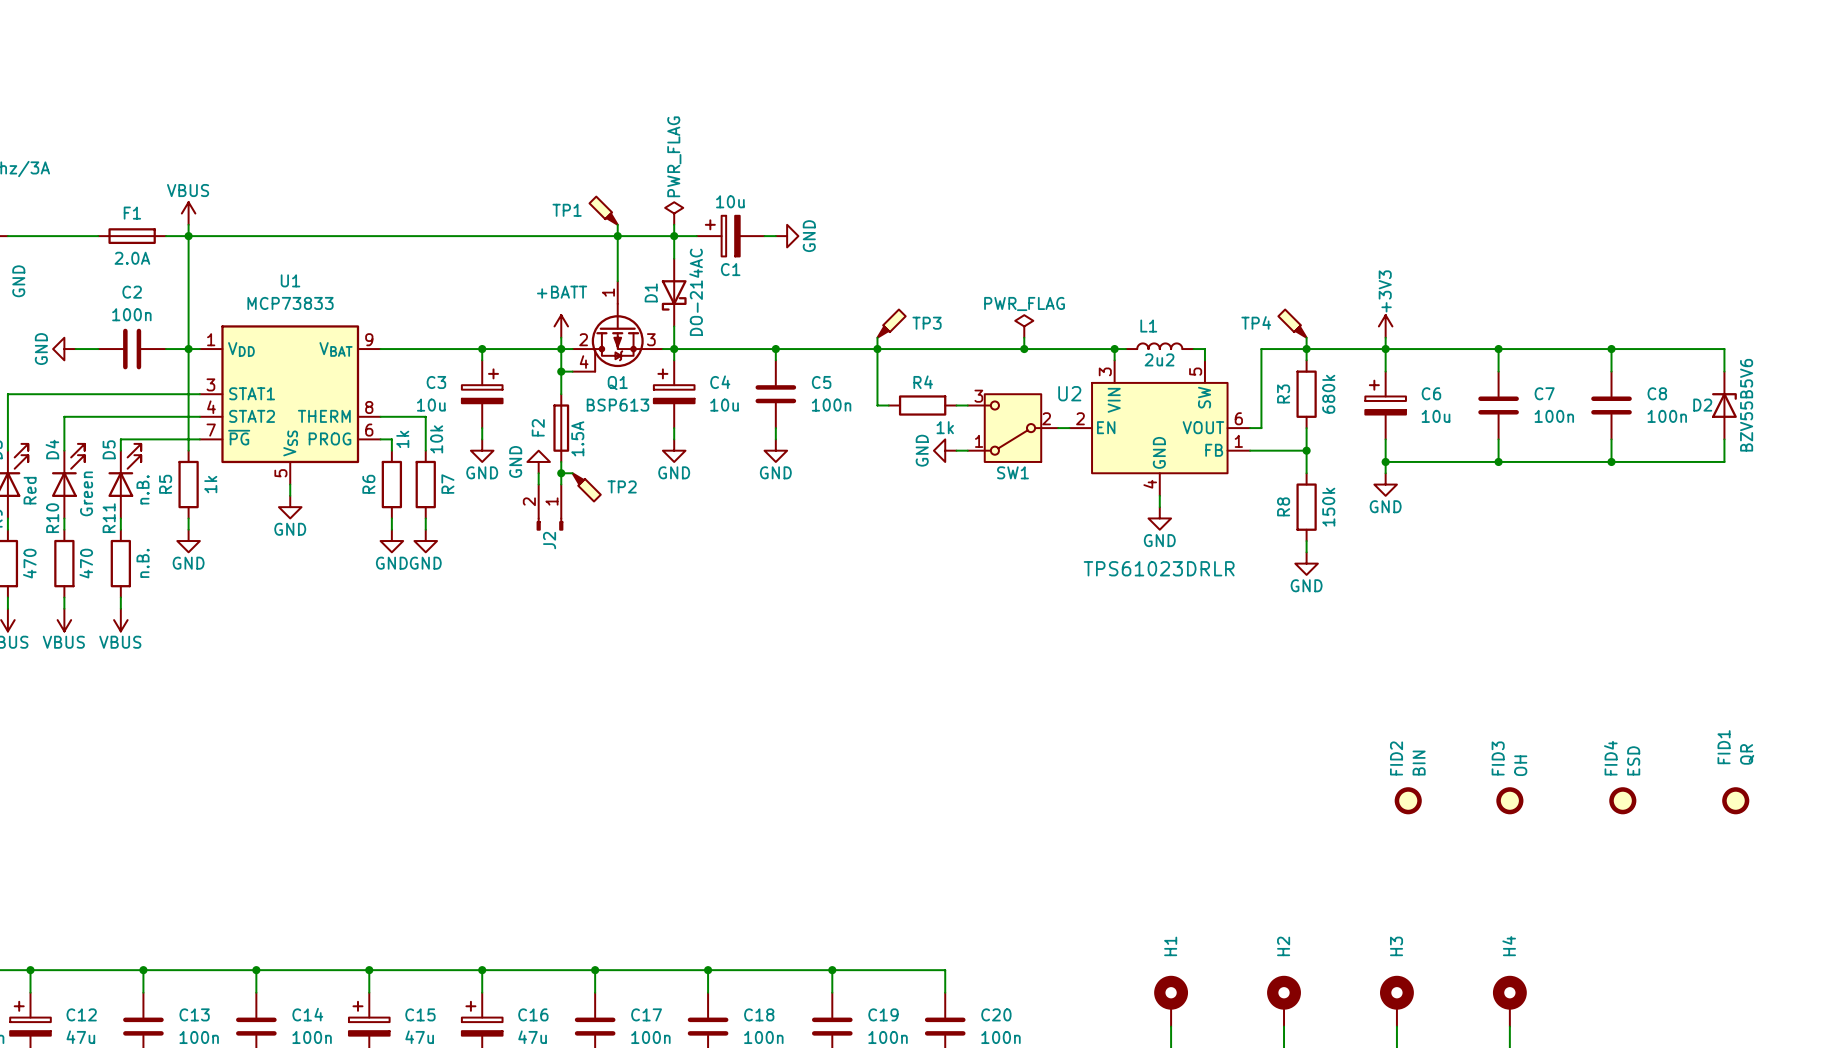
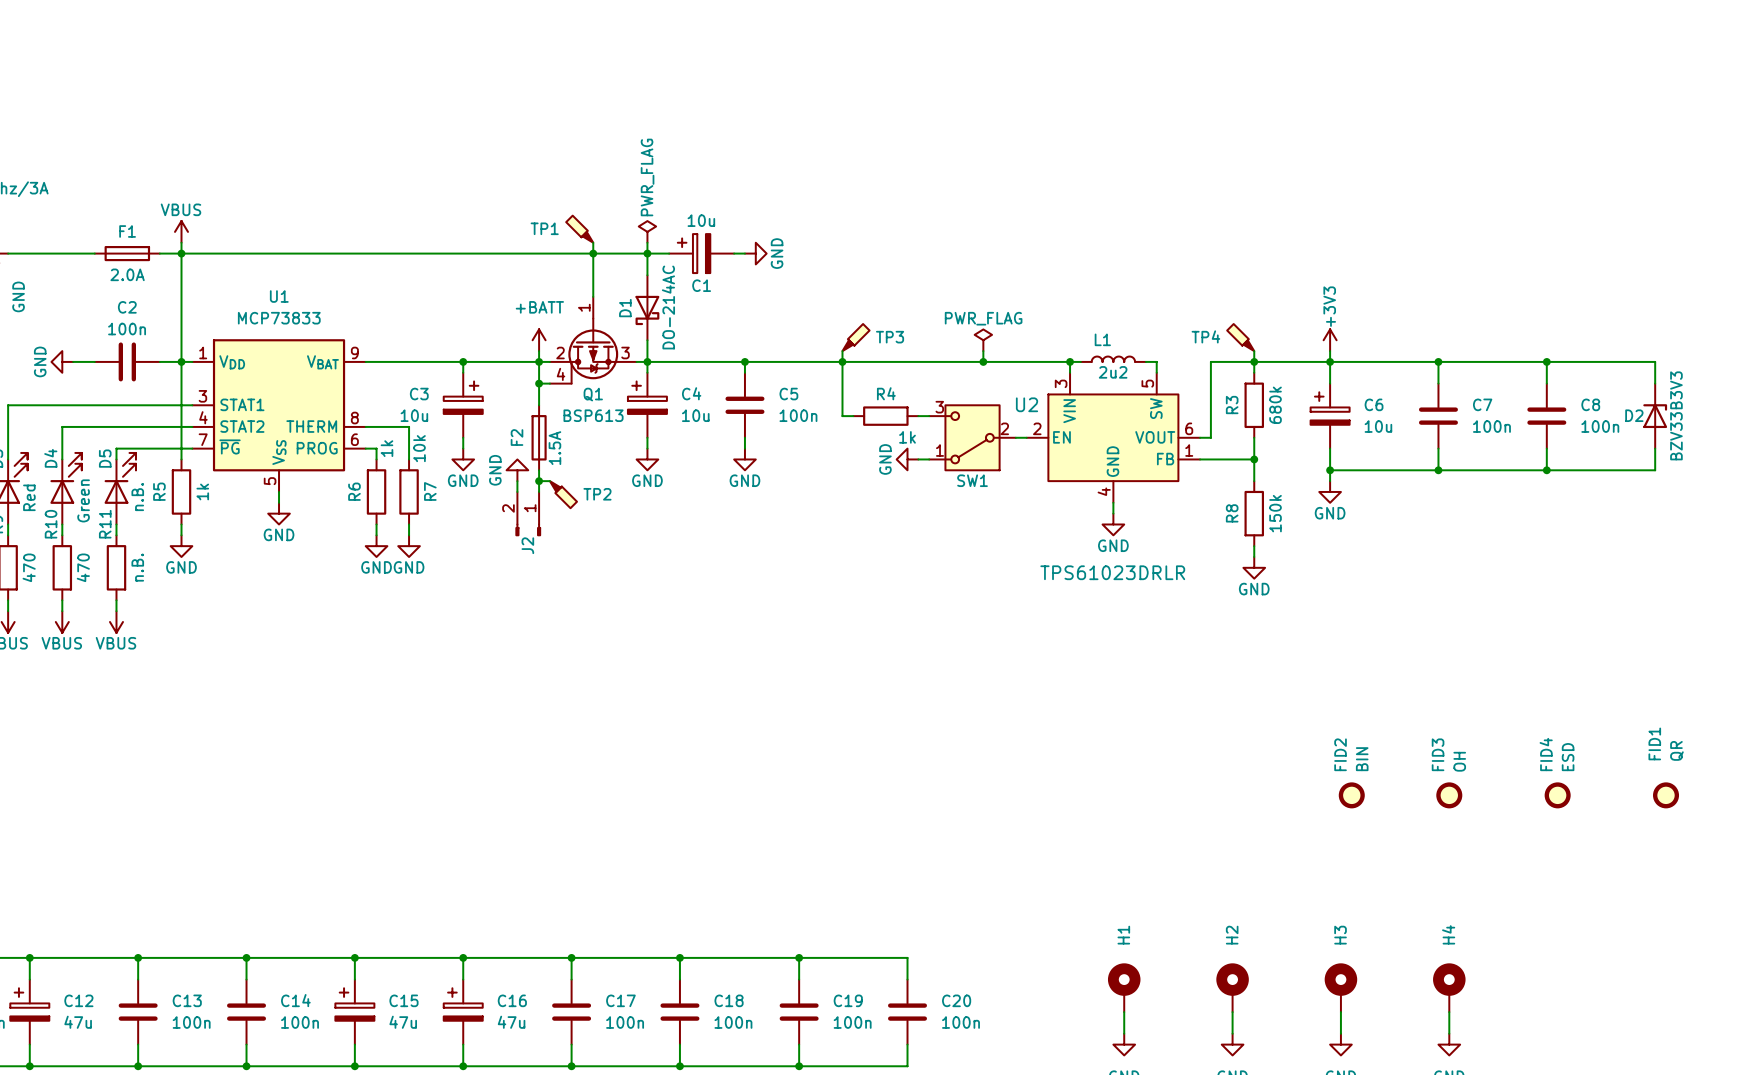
D2 value: BZV55B5V6 (1746, 405) -> BZV33B3V3 (1676, 415)

